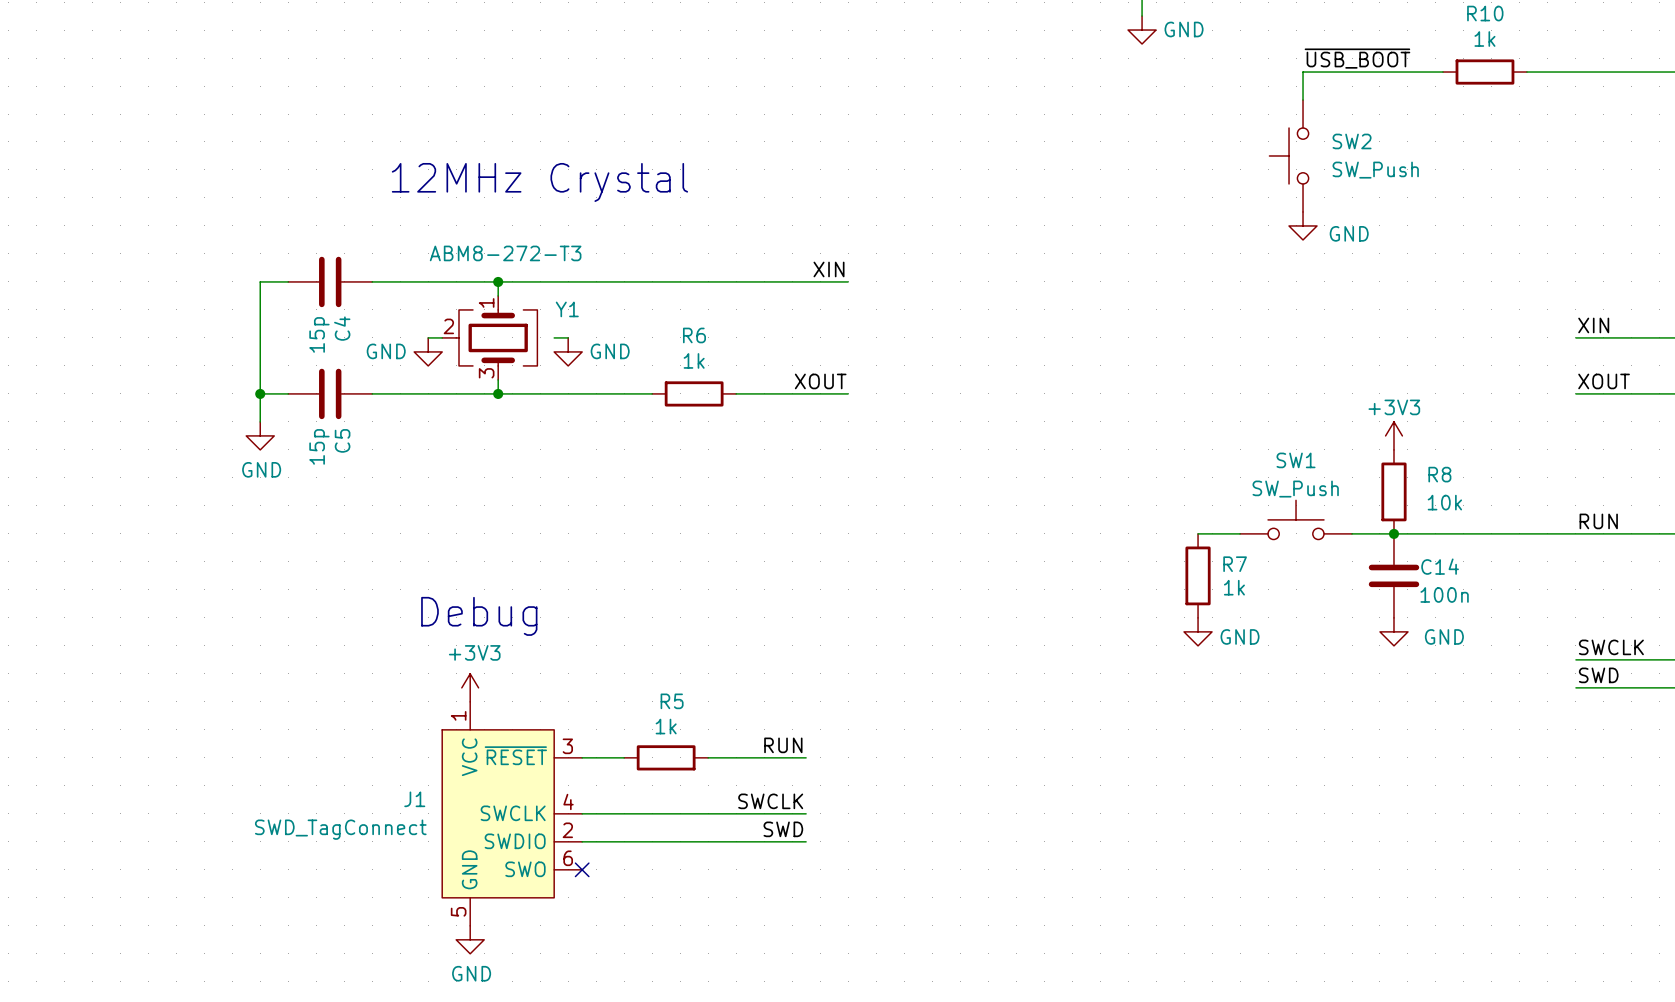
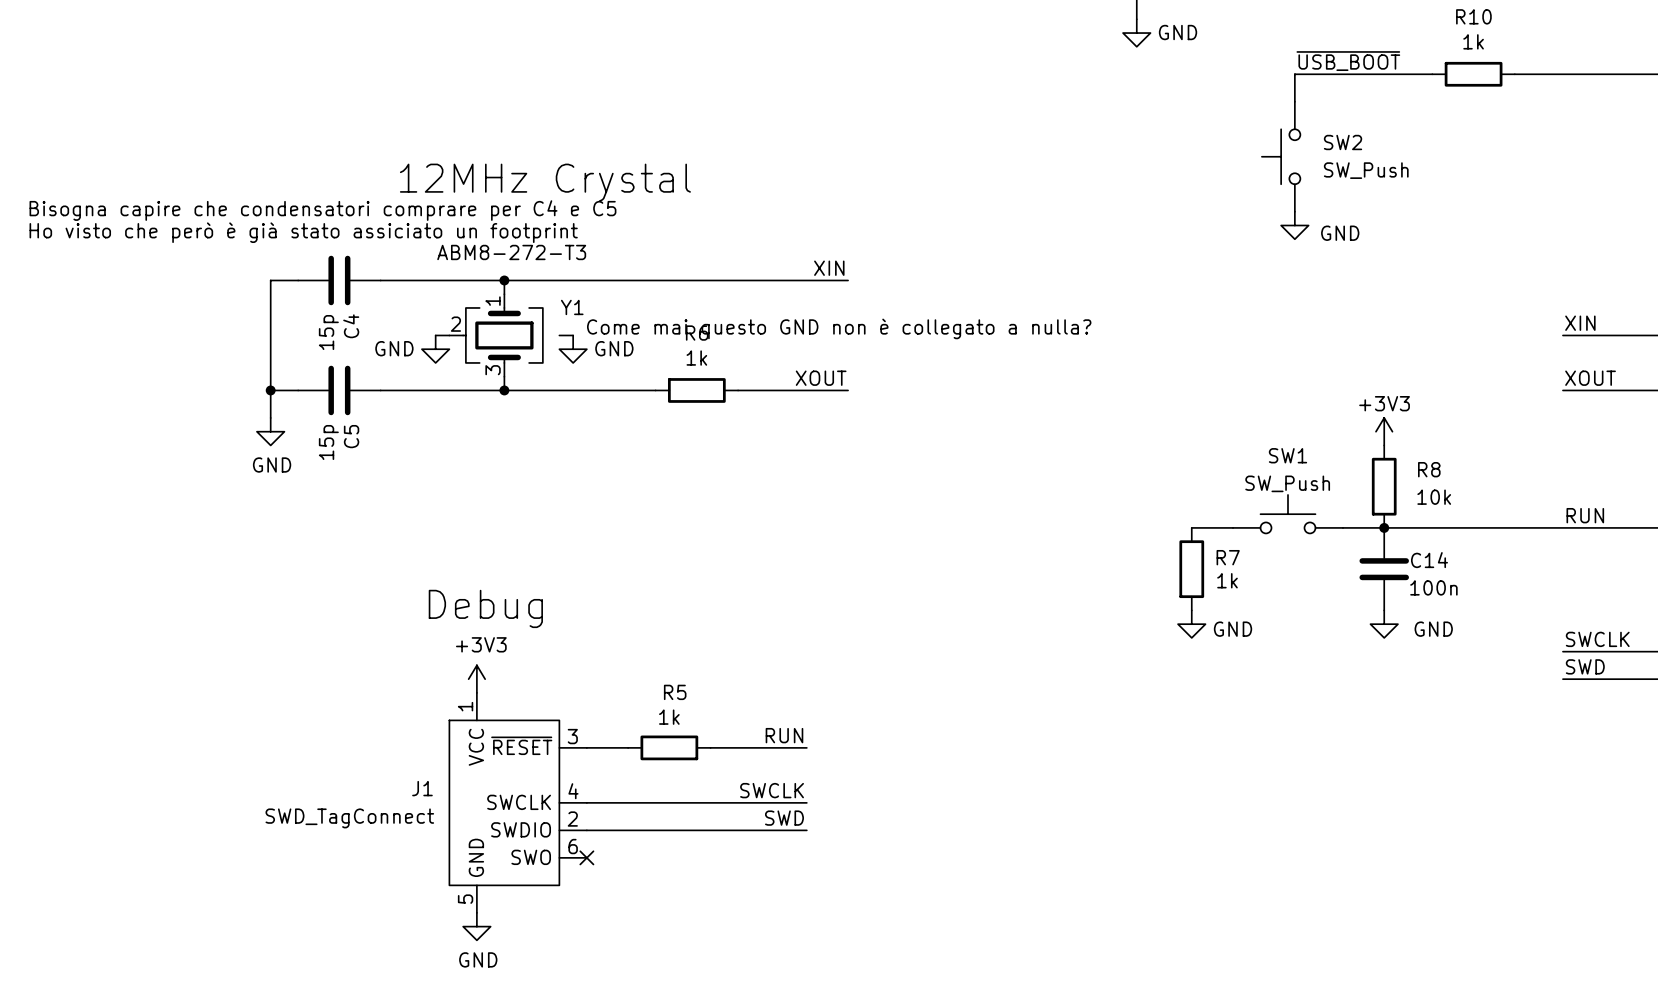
text: none -> Bisogna capire che condensatori comprare per C4 e C5 (322, 210)
text: none -> Ho visto che però è già stato assiciato un footprint (303, 232)
text: none -> Come mai questo GND non è collegato a nulla? (839, 328)

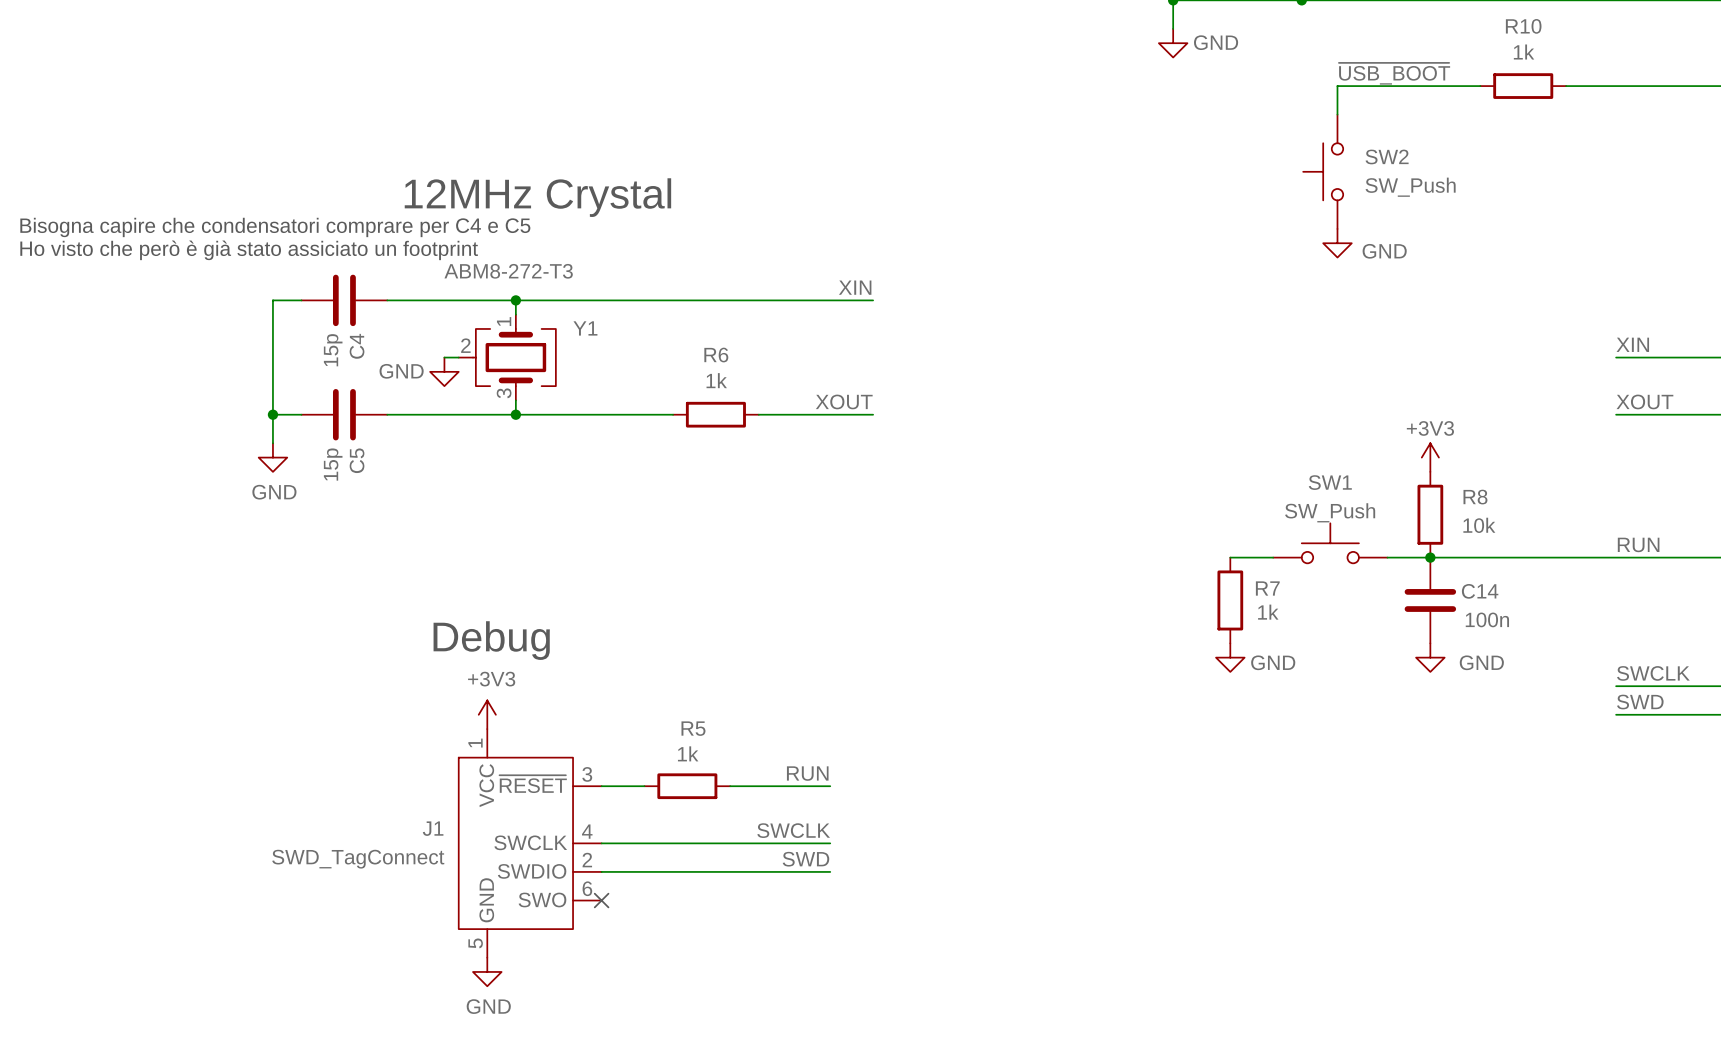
text: Come mai questo GND non è collegato a nulla? (839, 328) -> none
wire: (559, 335) (573, 335) -> none
power symbol: GND (573, 349) -> none

